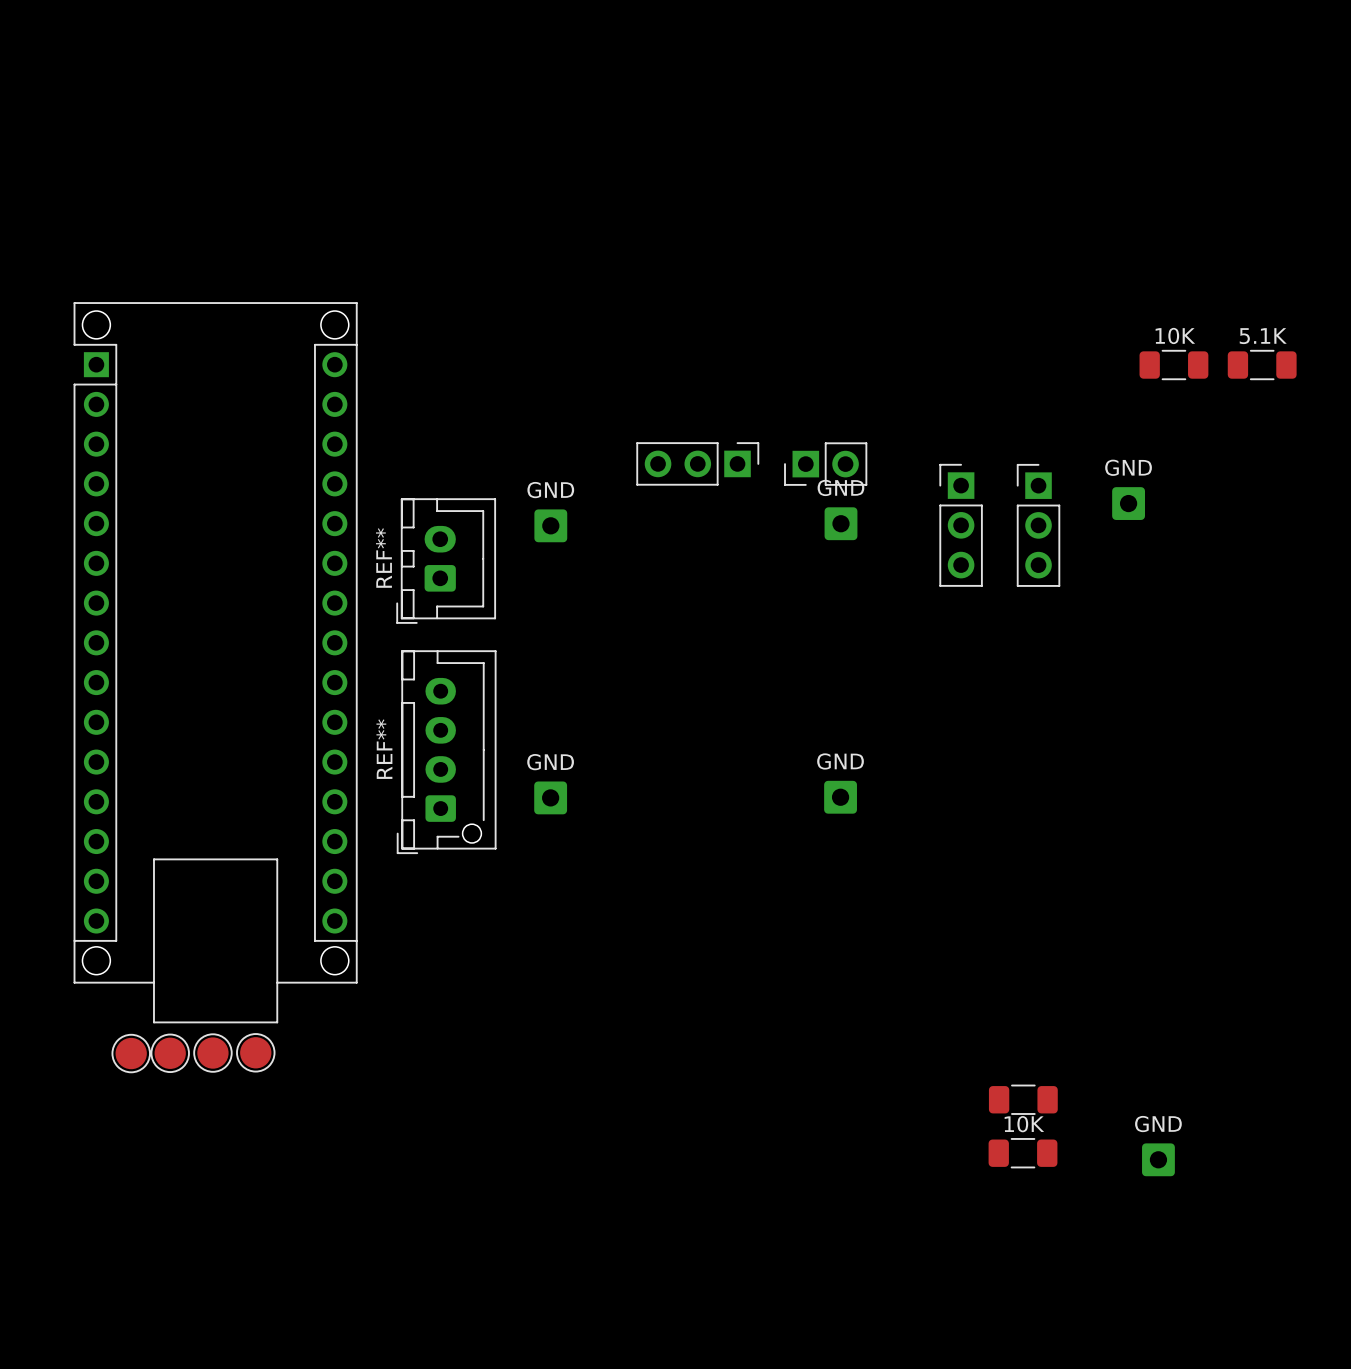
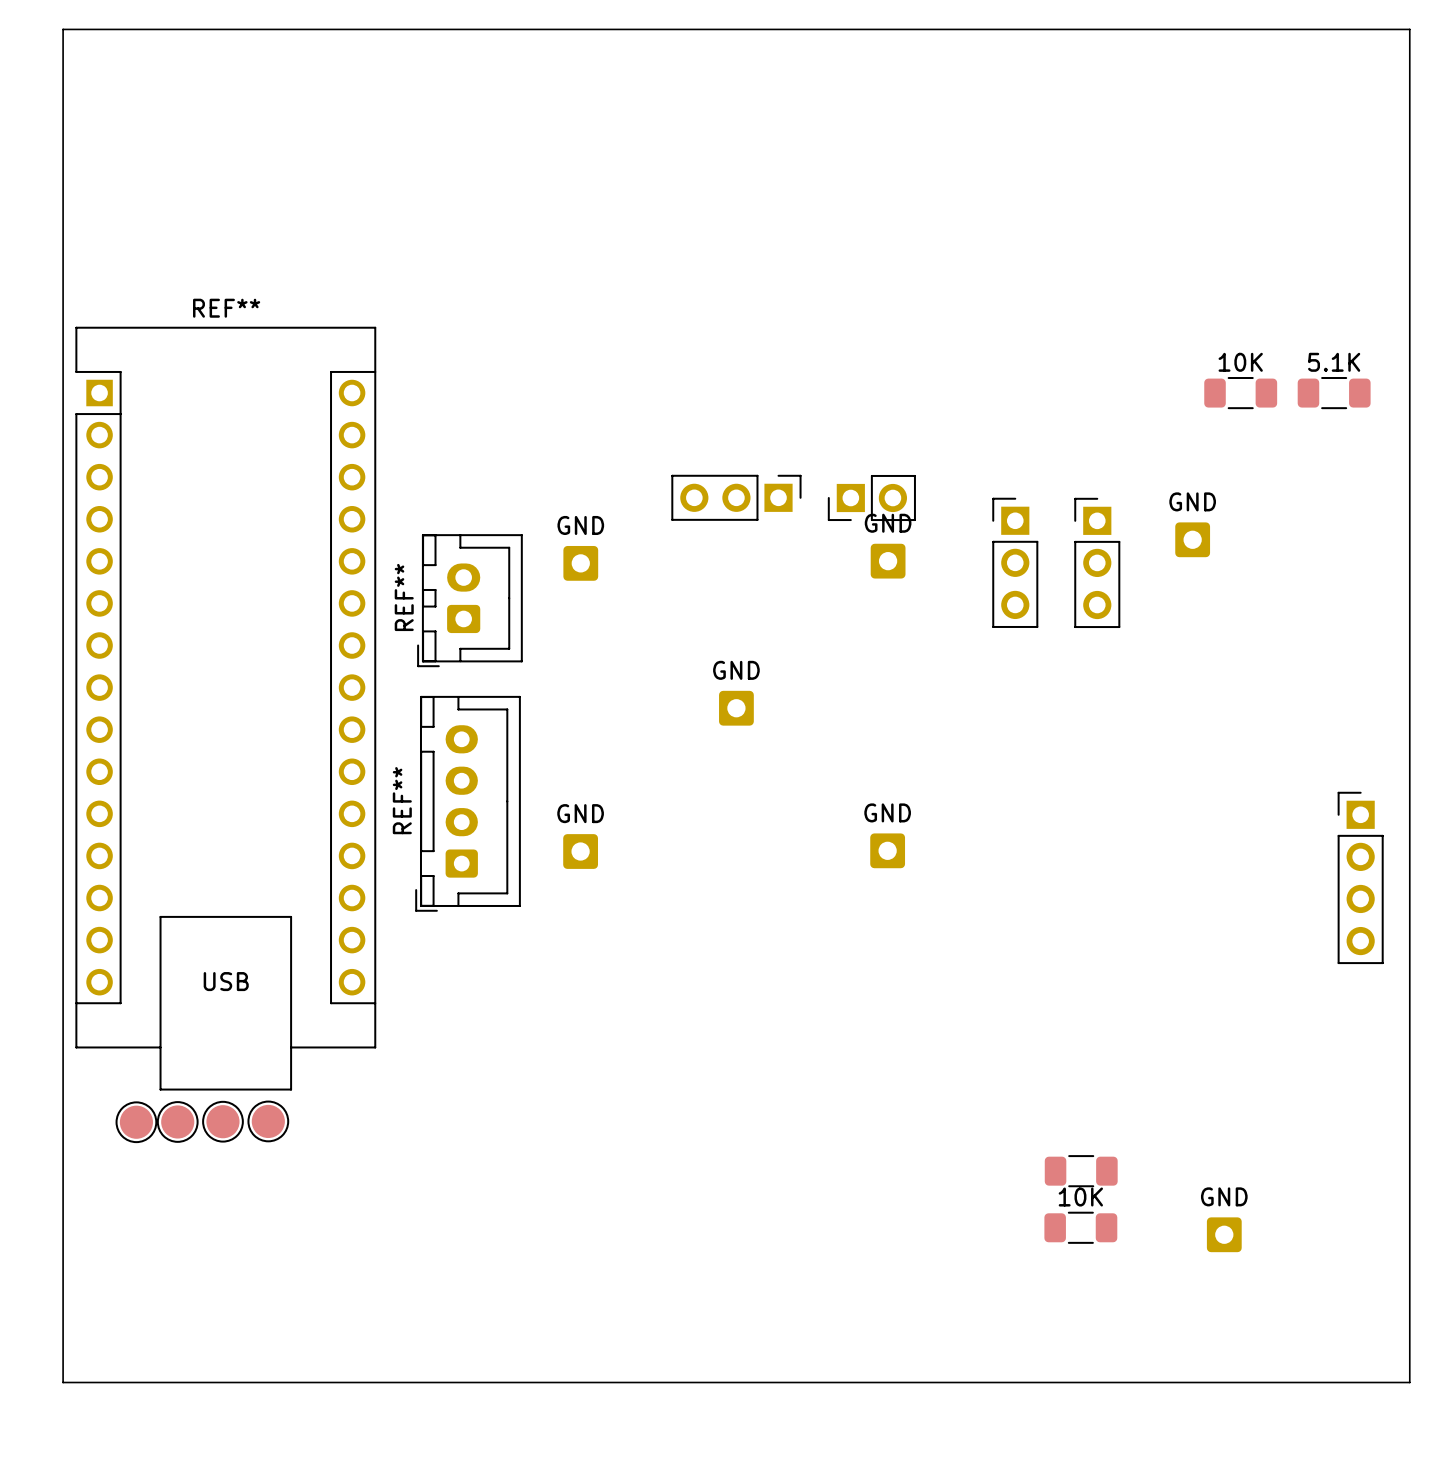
board edge: none -> (63, 29) (1409, 29) (1409, 1382) (63, 1382) (63, 29)
REF** footprint: [396, 650, 497, 855] -> [415, 695, 521, 912]
part: (215, 662) -> none
GND: none -> (736, 708)
REF**: none -> (225, 708)
part: none -> (1360, 877)

